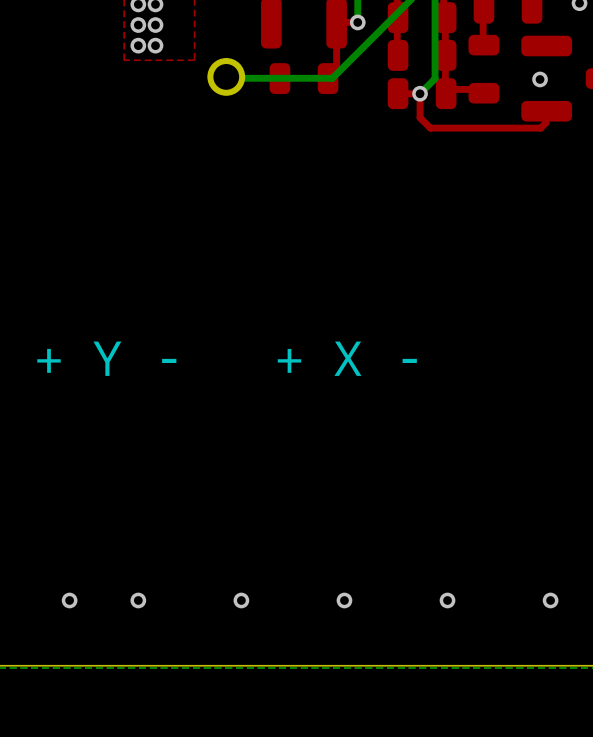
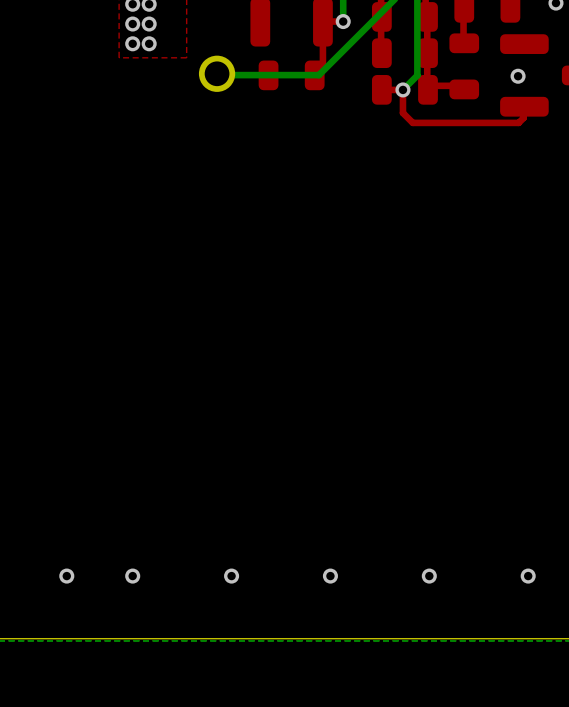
text: Y (107, 358) -> none
text: X (347, 358) -> none
text: + (49, 360) -> none
text: - (169, 360) -> none
text: + (289, 360) -> none
text: - (409, 360) -> none

